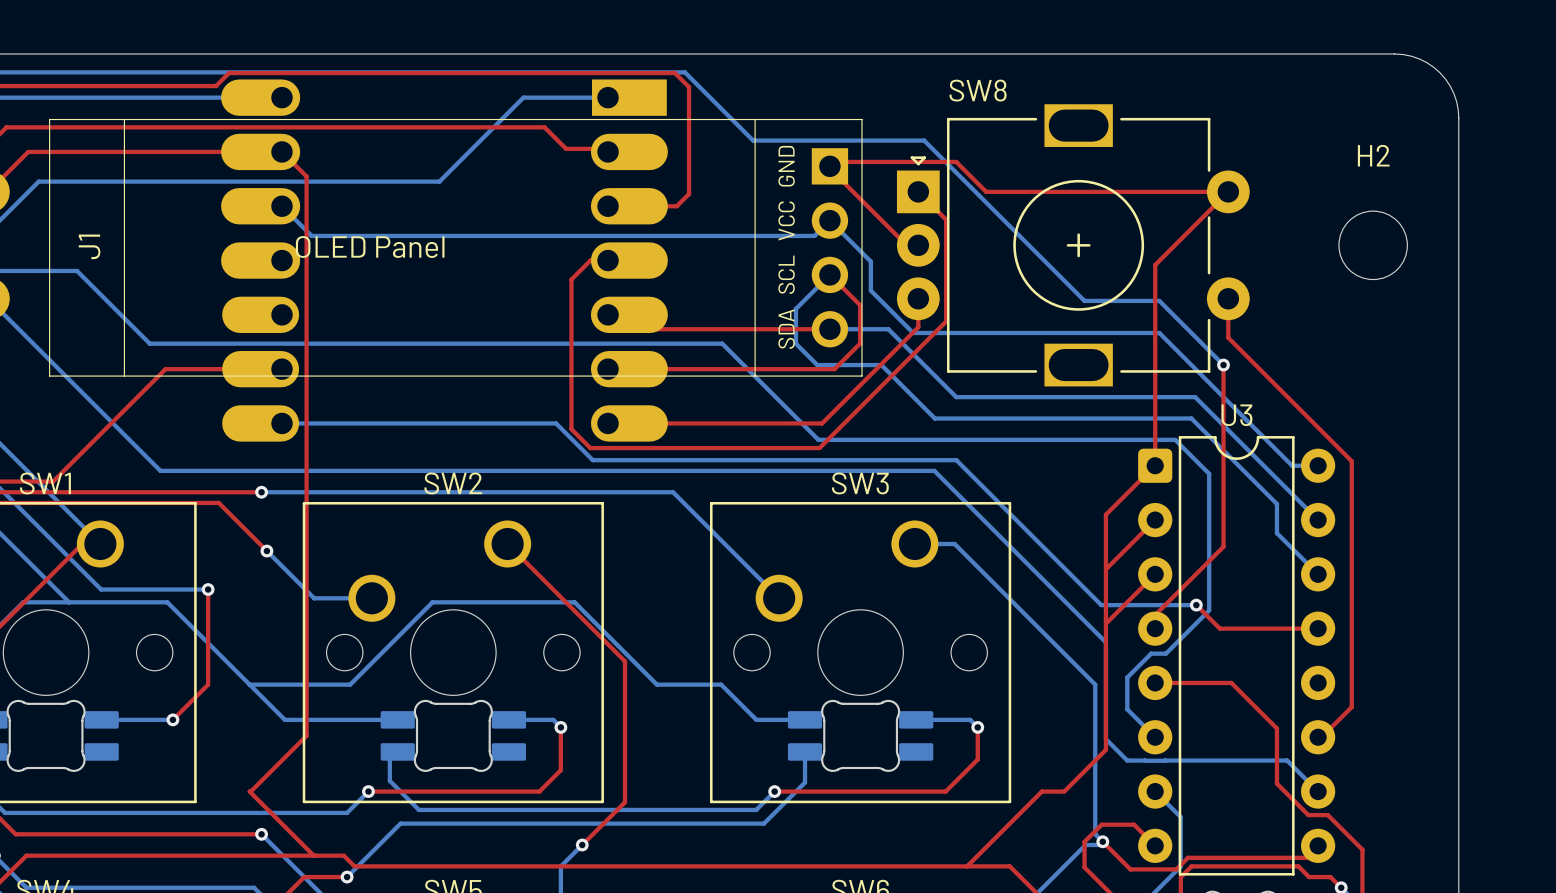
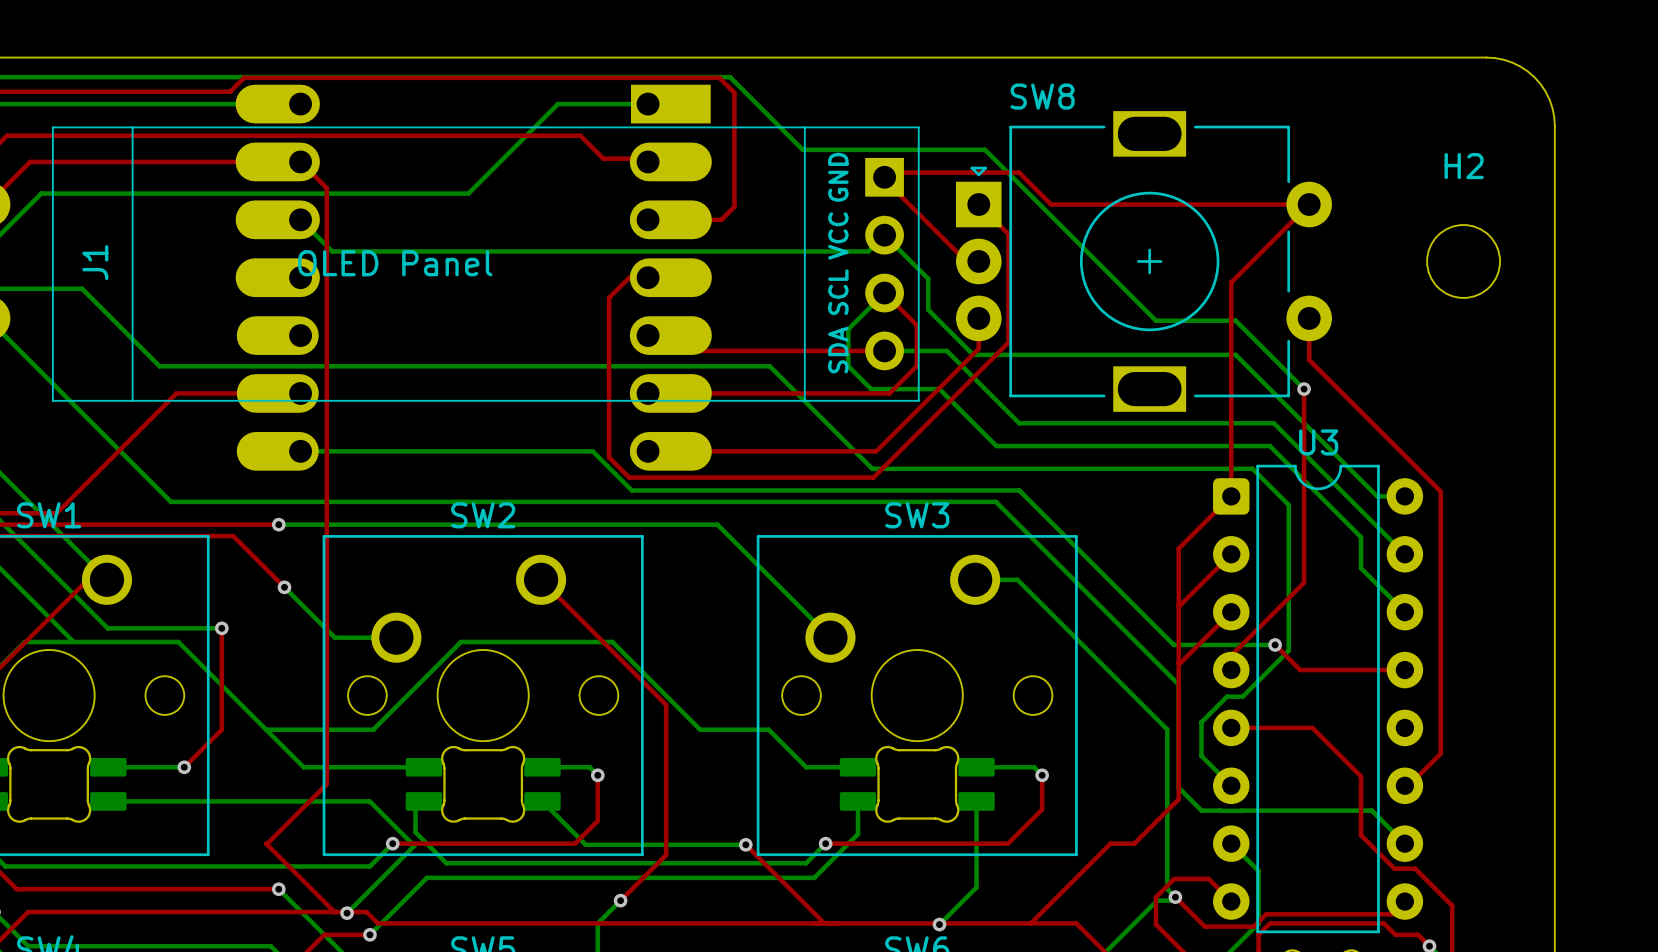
bottom track: none -> (108, 801) (369, 801) (414, 845)
bottom track: none -> (542, 801) (585, 844) (745, 844)
bottom track: none -> (976, 801) (976, 887) (939, 924)
top track: none -> (745, 844) (824, 923)
via: none -> (745, 844)
bottom track: none -> (414, 846) (347, 913)
via: none -> (347, 913)
via: none -> (939, 924)

